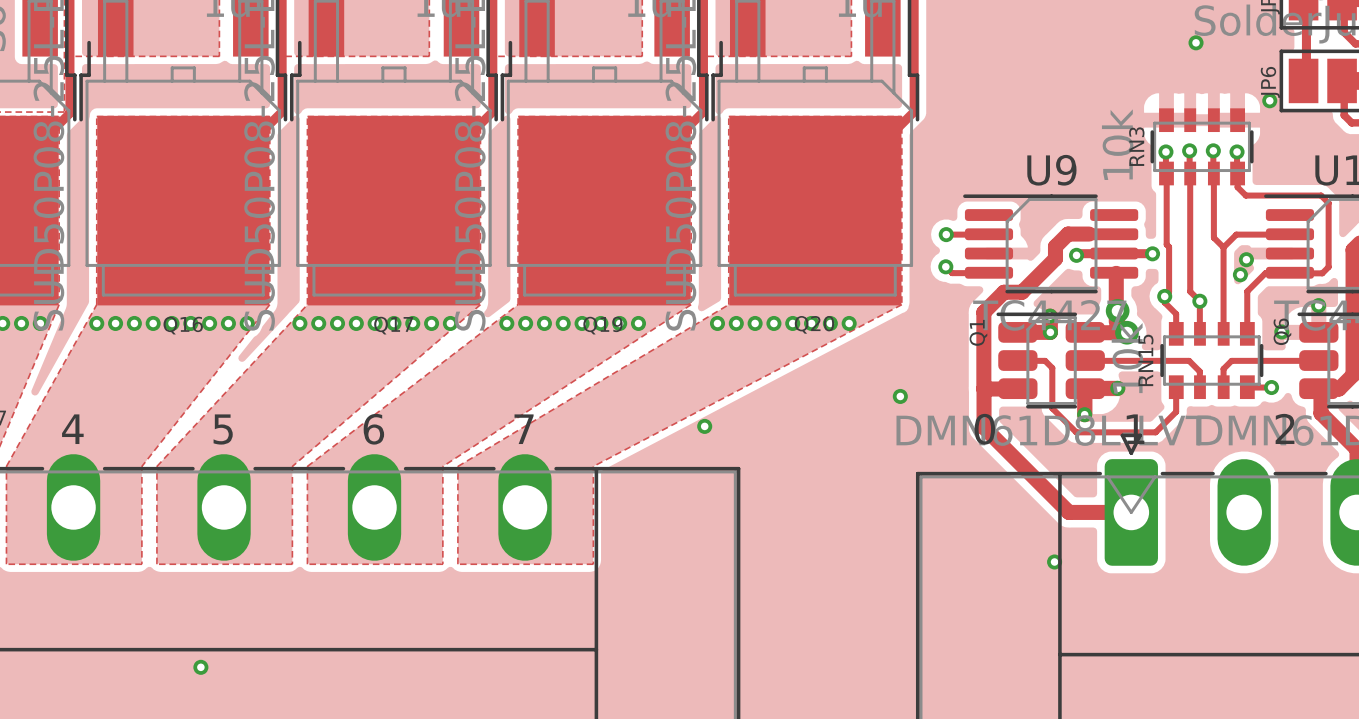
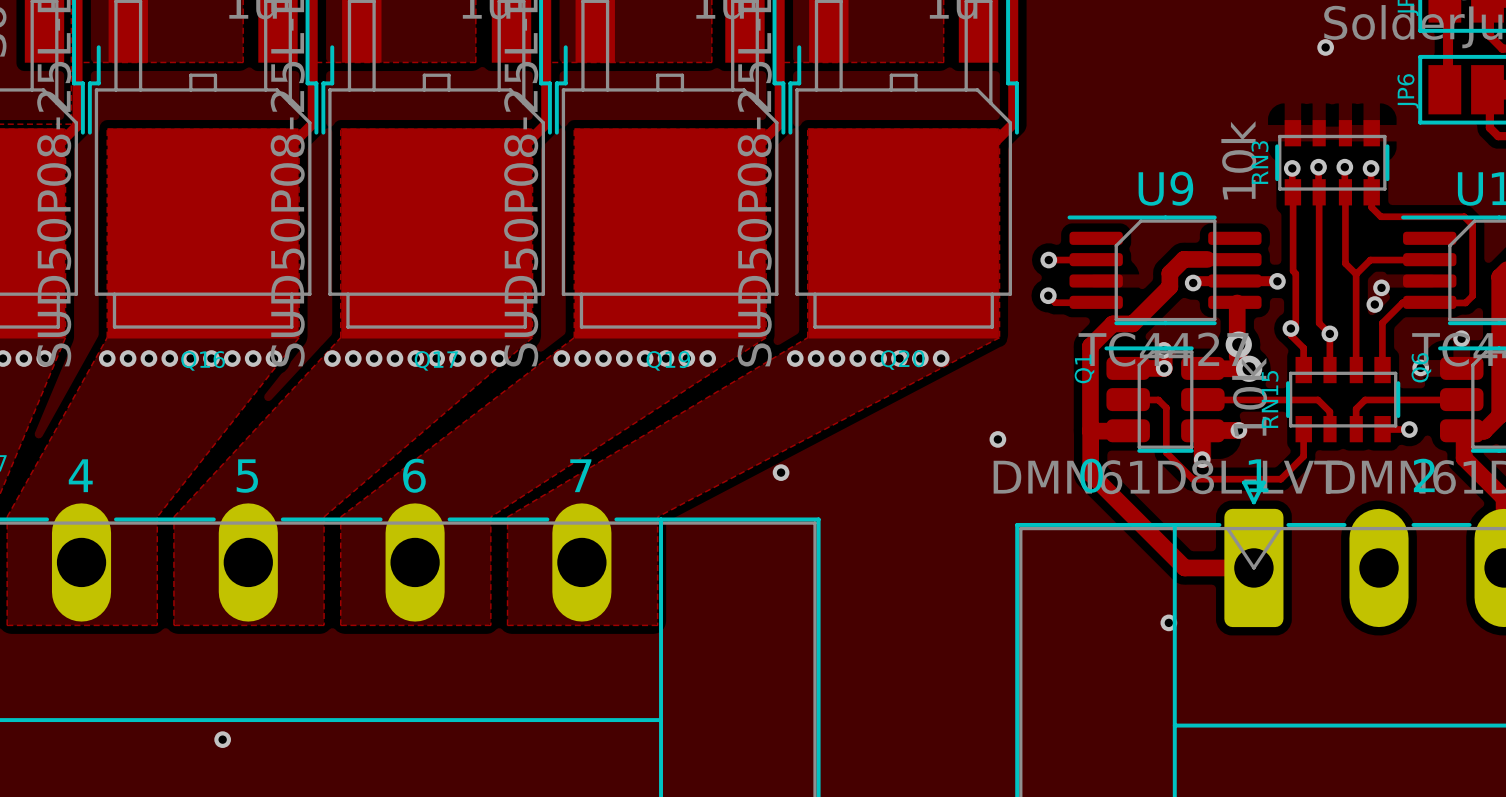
via: (1269, 100) -> none

